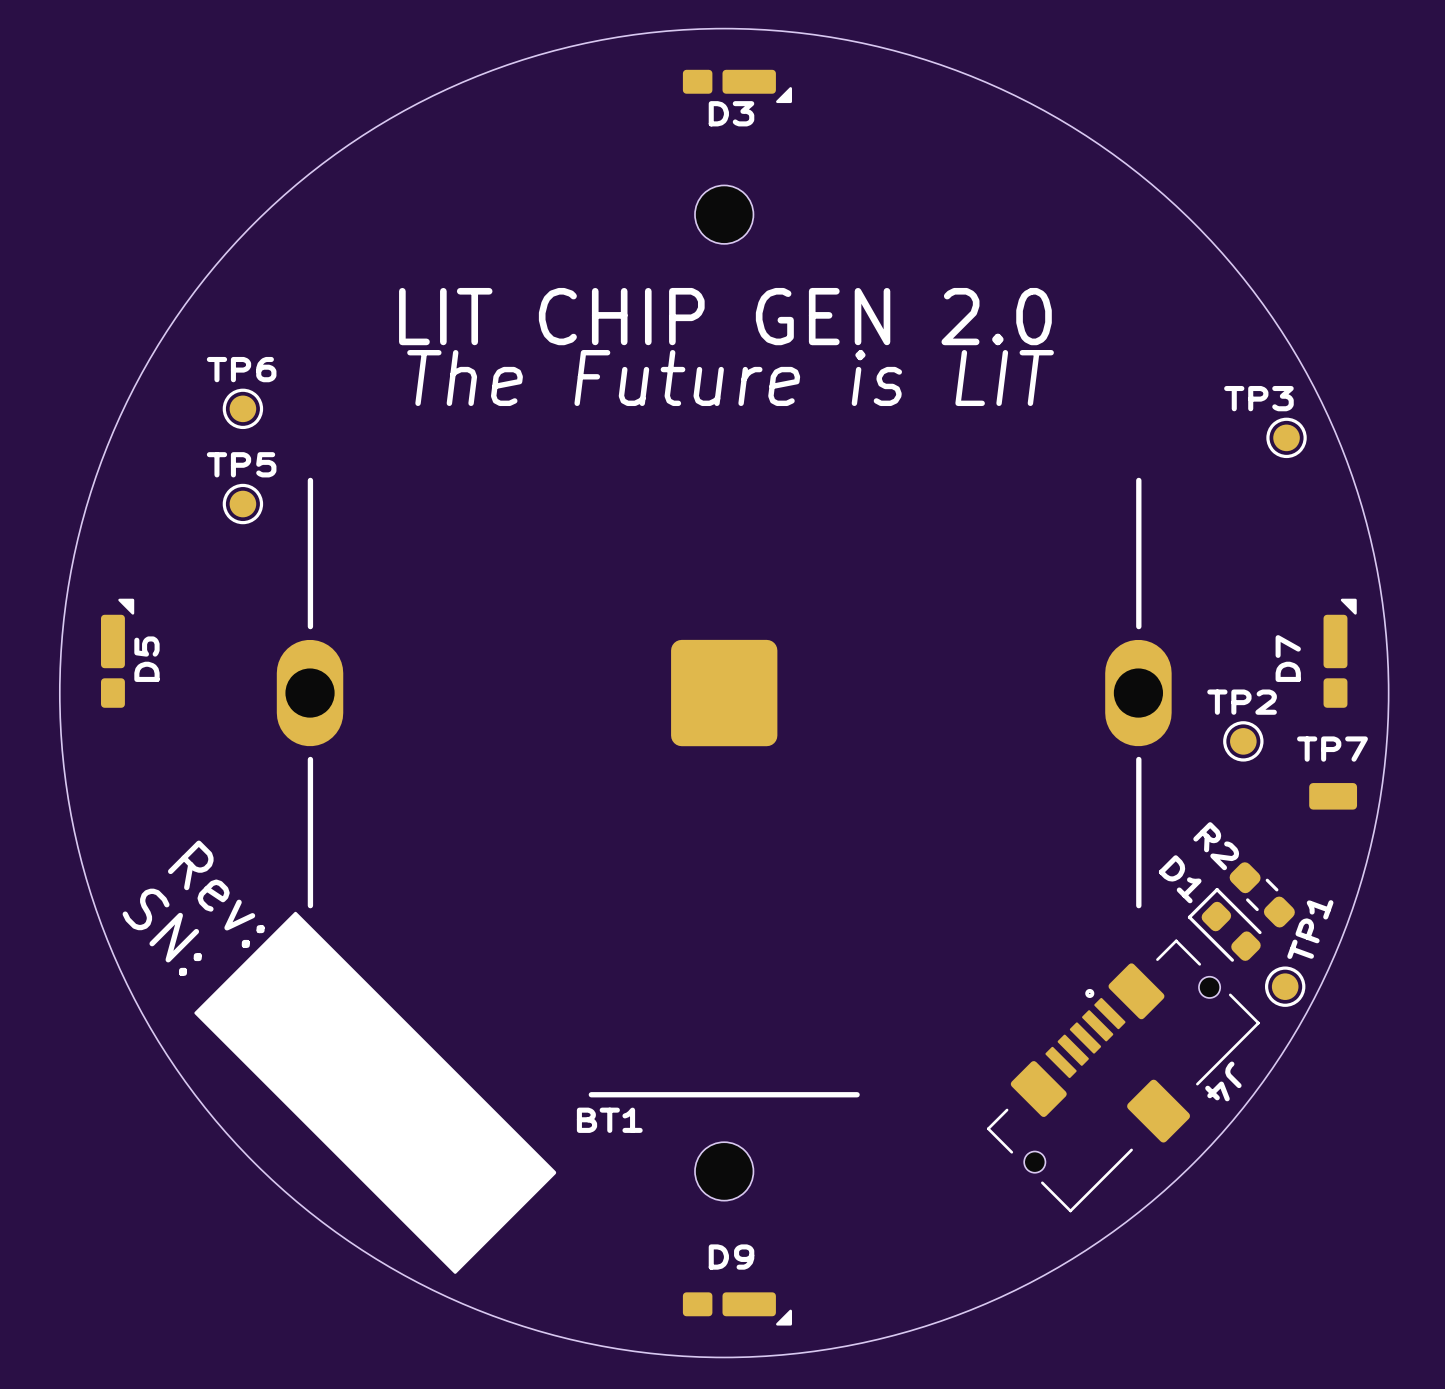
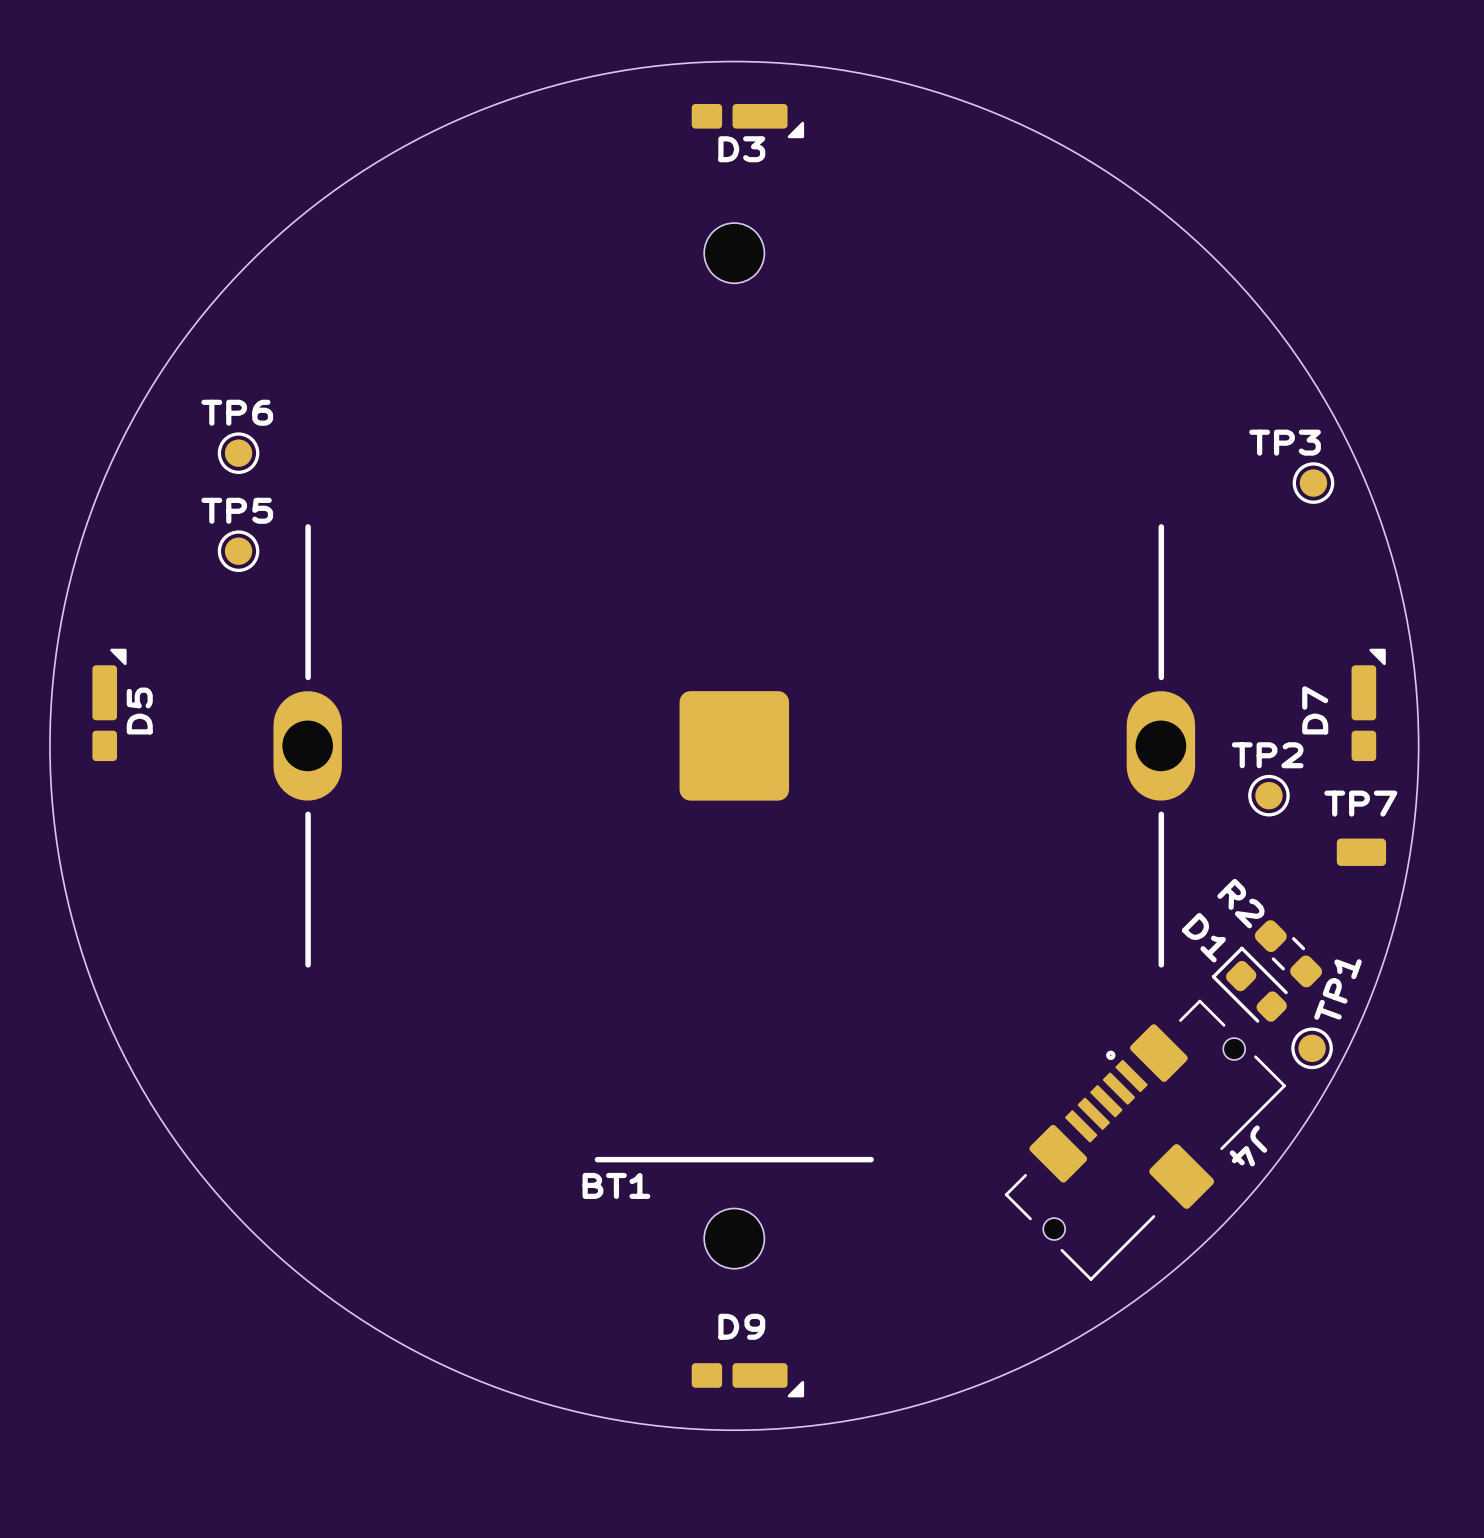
text: LIT CHIP GEN 2.0 (725, 316) -> none
text: The Future is LIT (730, 378) -> none
text: Rev: (216, 894) -> none
drawing: [194, 911, 557, 1274] -> none
text: SN: (162, 932) -> none

